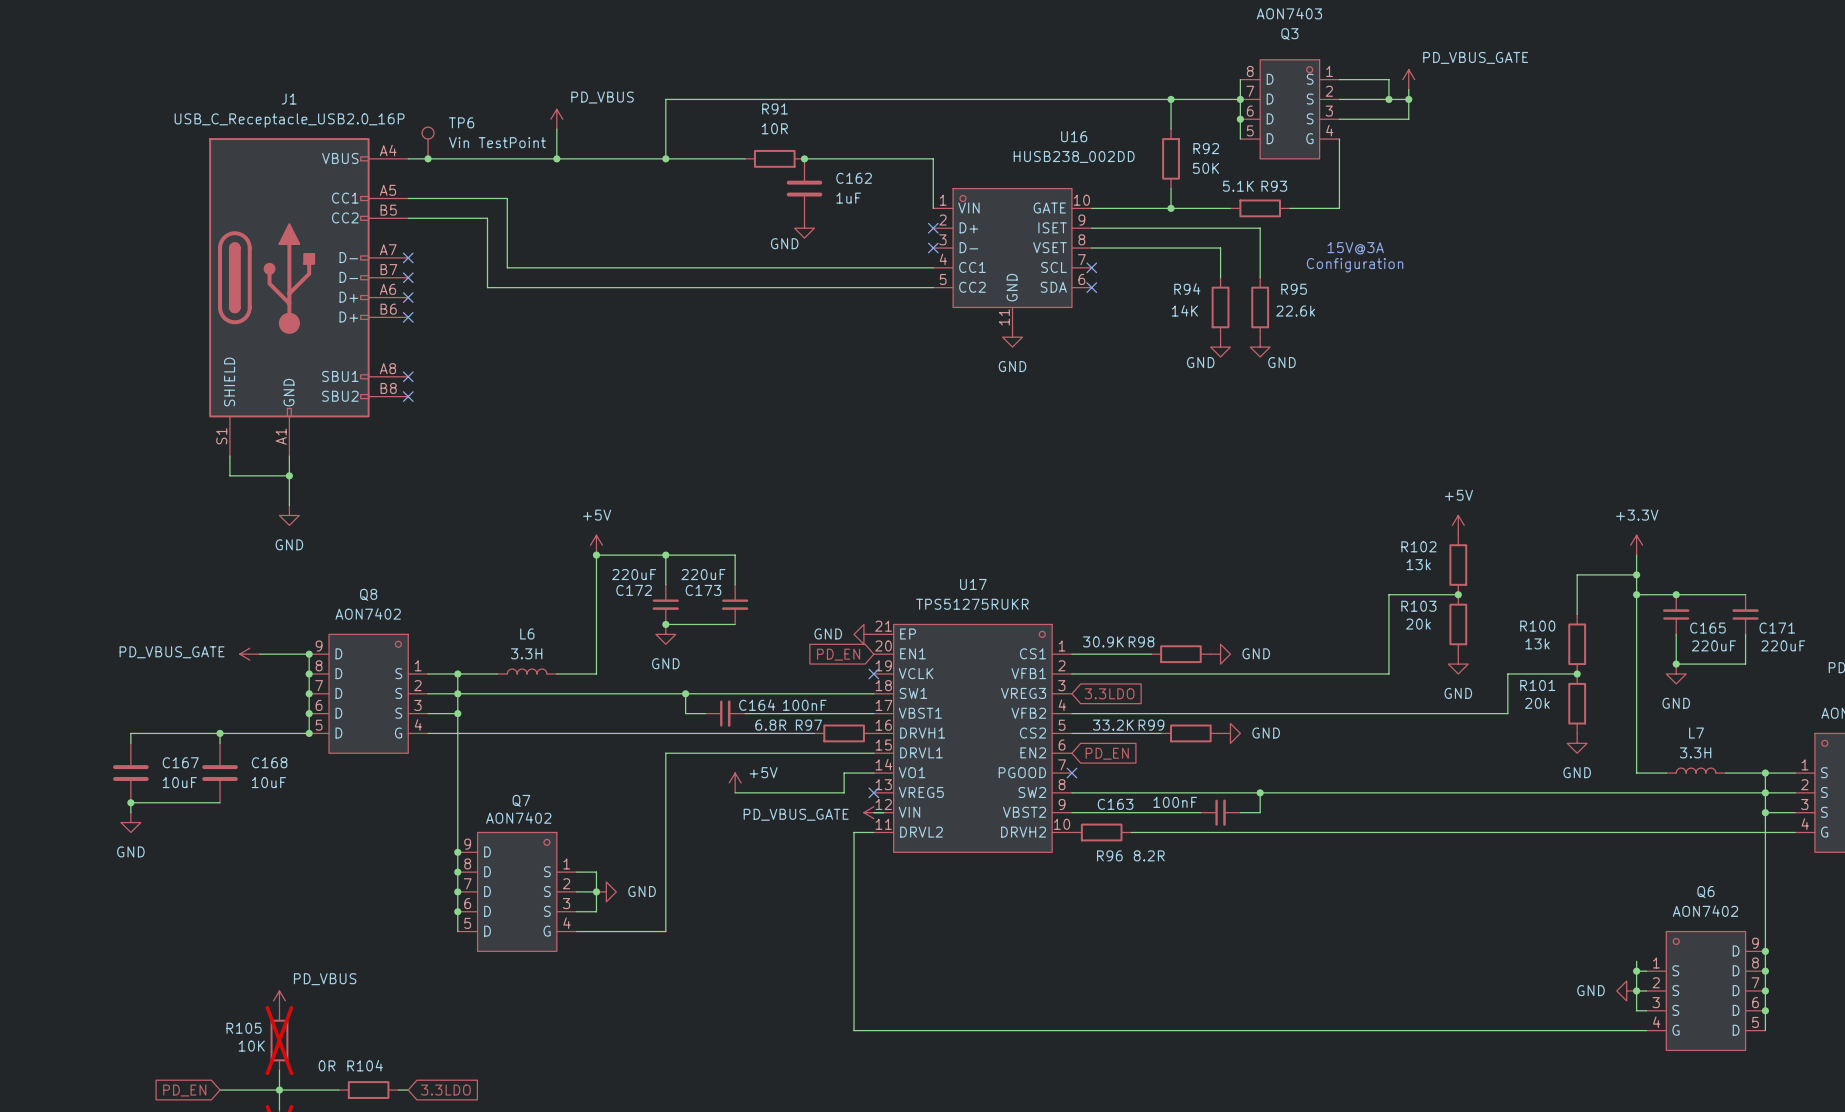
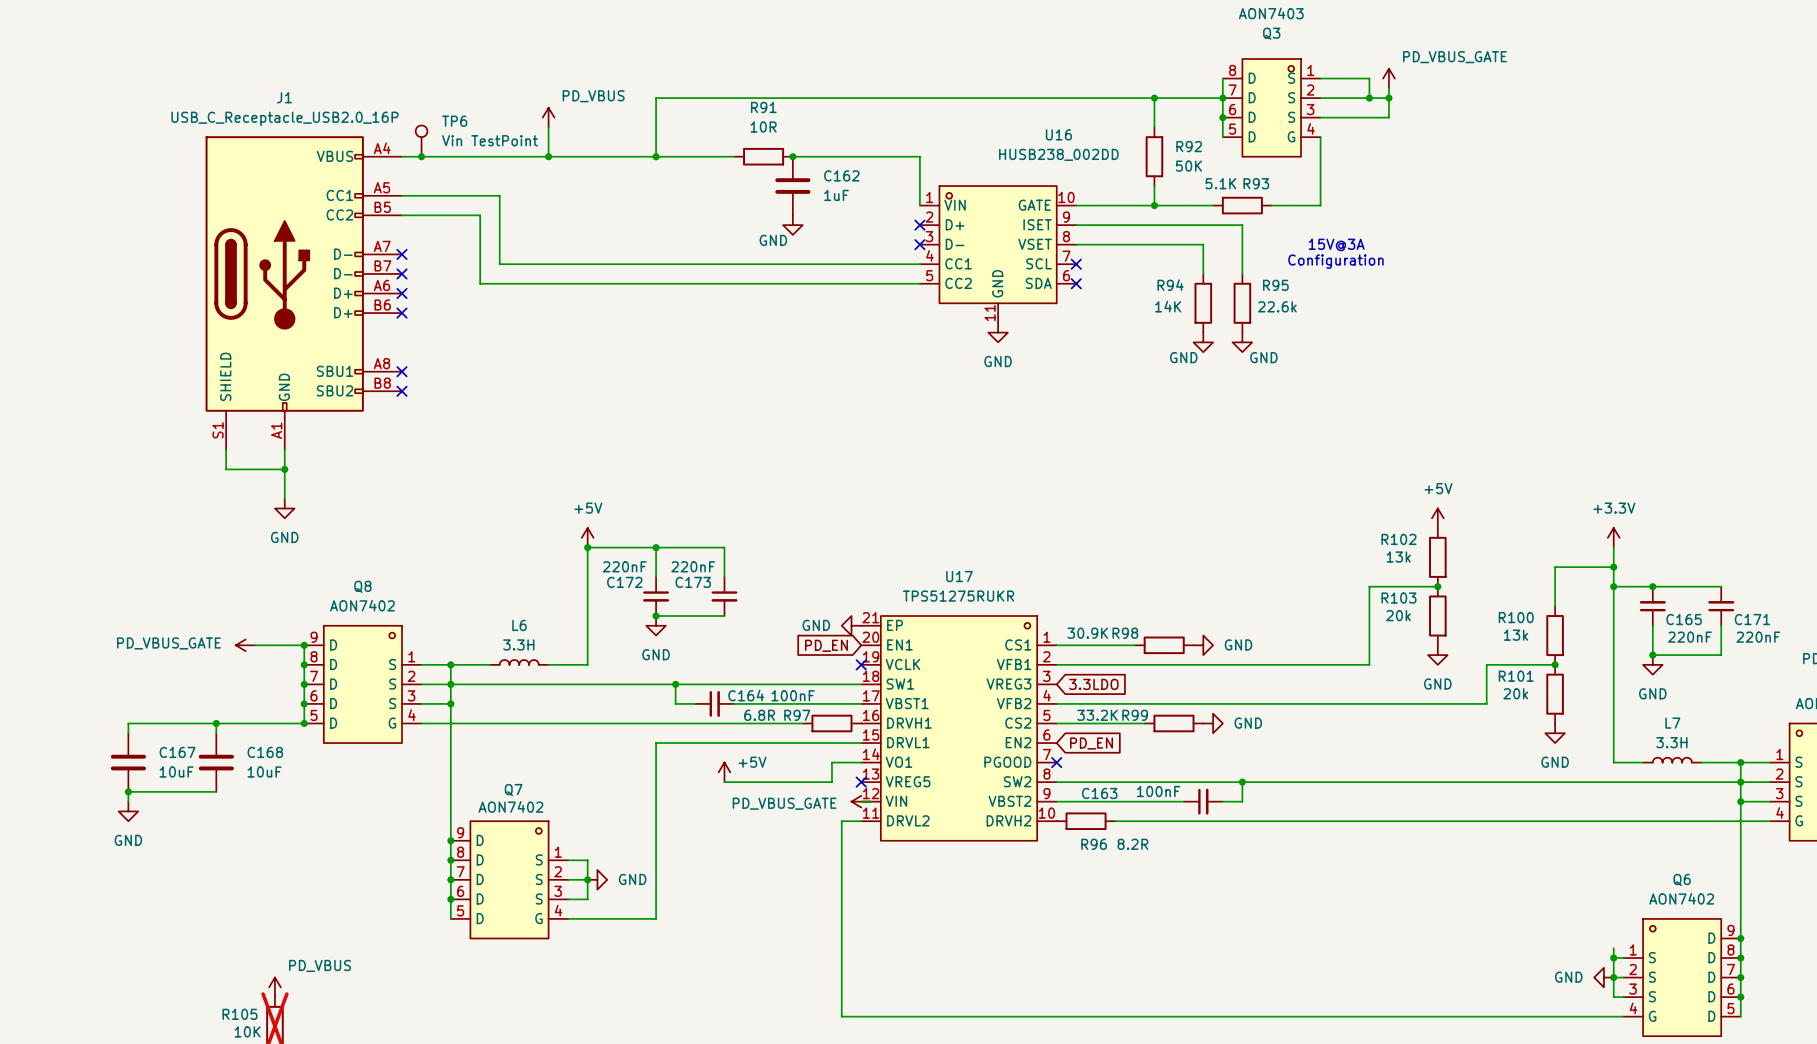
C172 value: 220uF (634, 574) -> 220nF (624, 566)
C173 value: 220uF (703, 574) -> 220nF (693, 566)
C165 value: 220uF (1713, 645) -> 220nF (1689, 637)
C171 value: 220uF (1783, 645) -> 220nF (1758, 637)

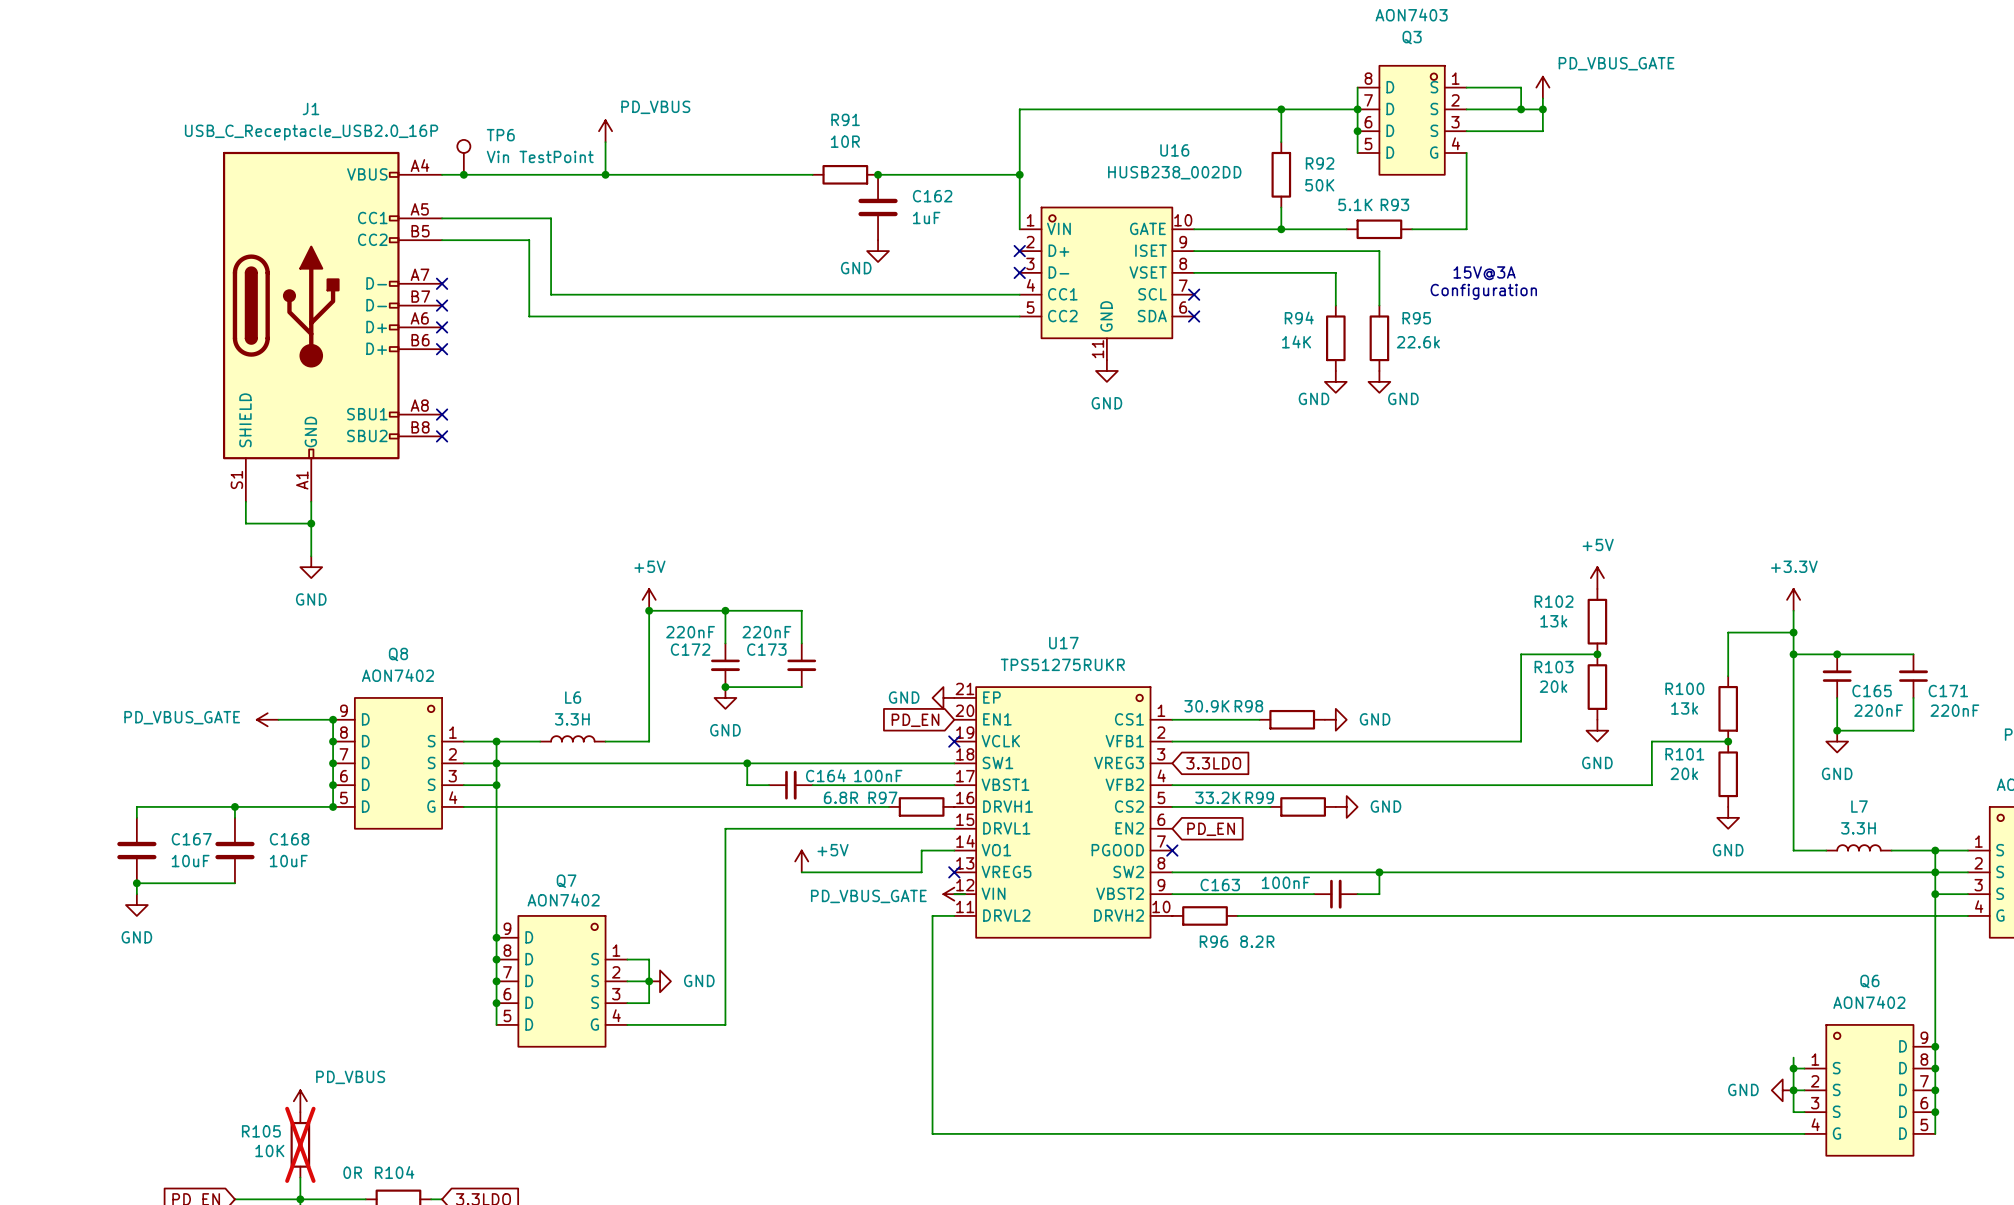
wire: (919, 98) (656, 98) (656, 156) -> (1019, 109) (1019, 174)
junction: (656, 156) -> none
junction: none -> (1019, 174)

